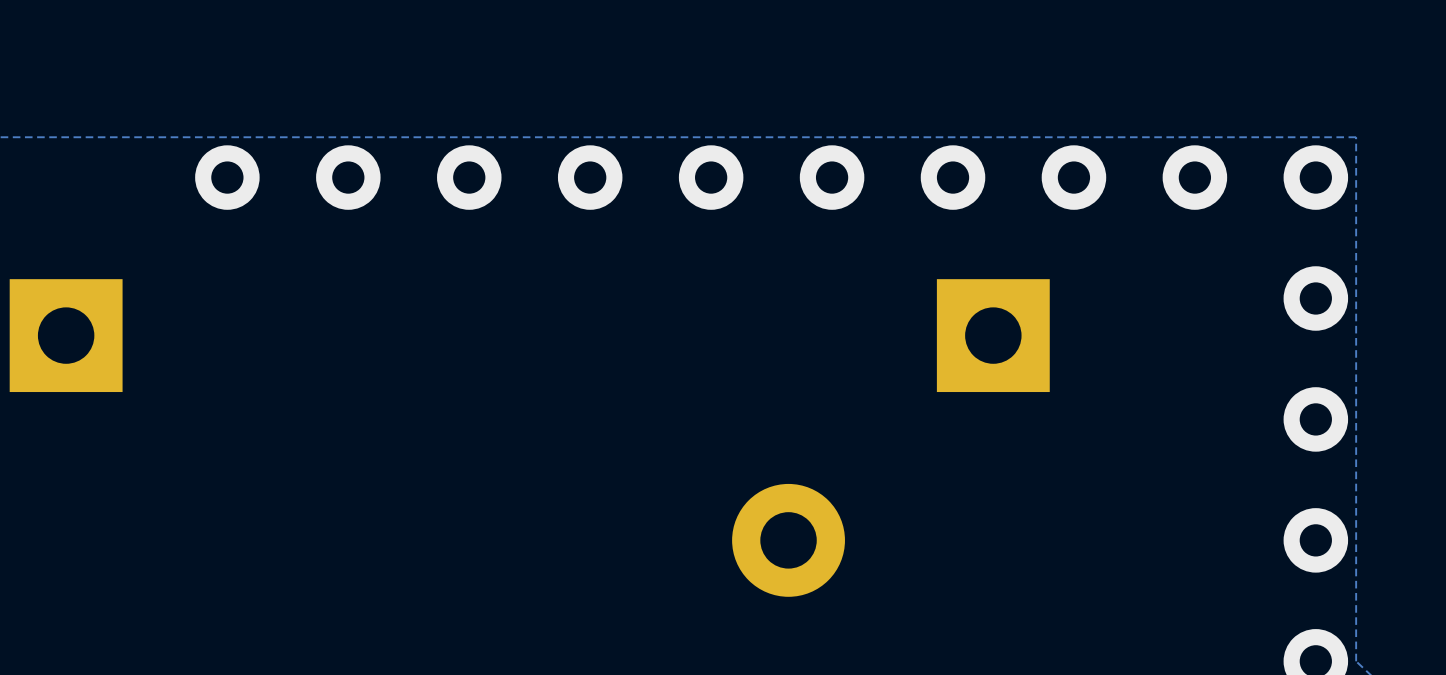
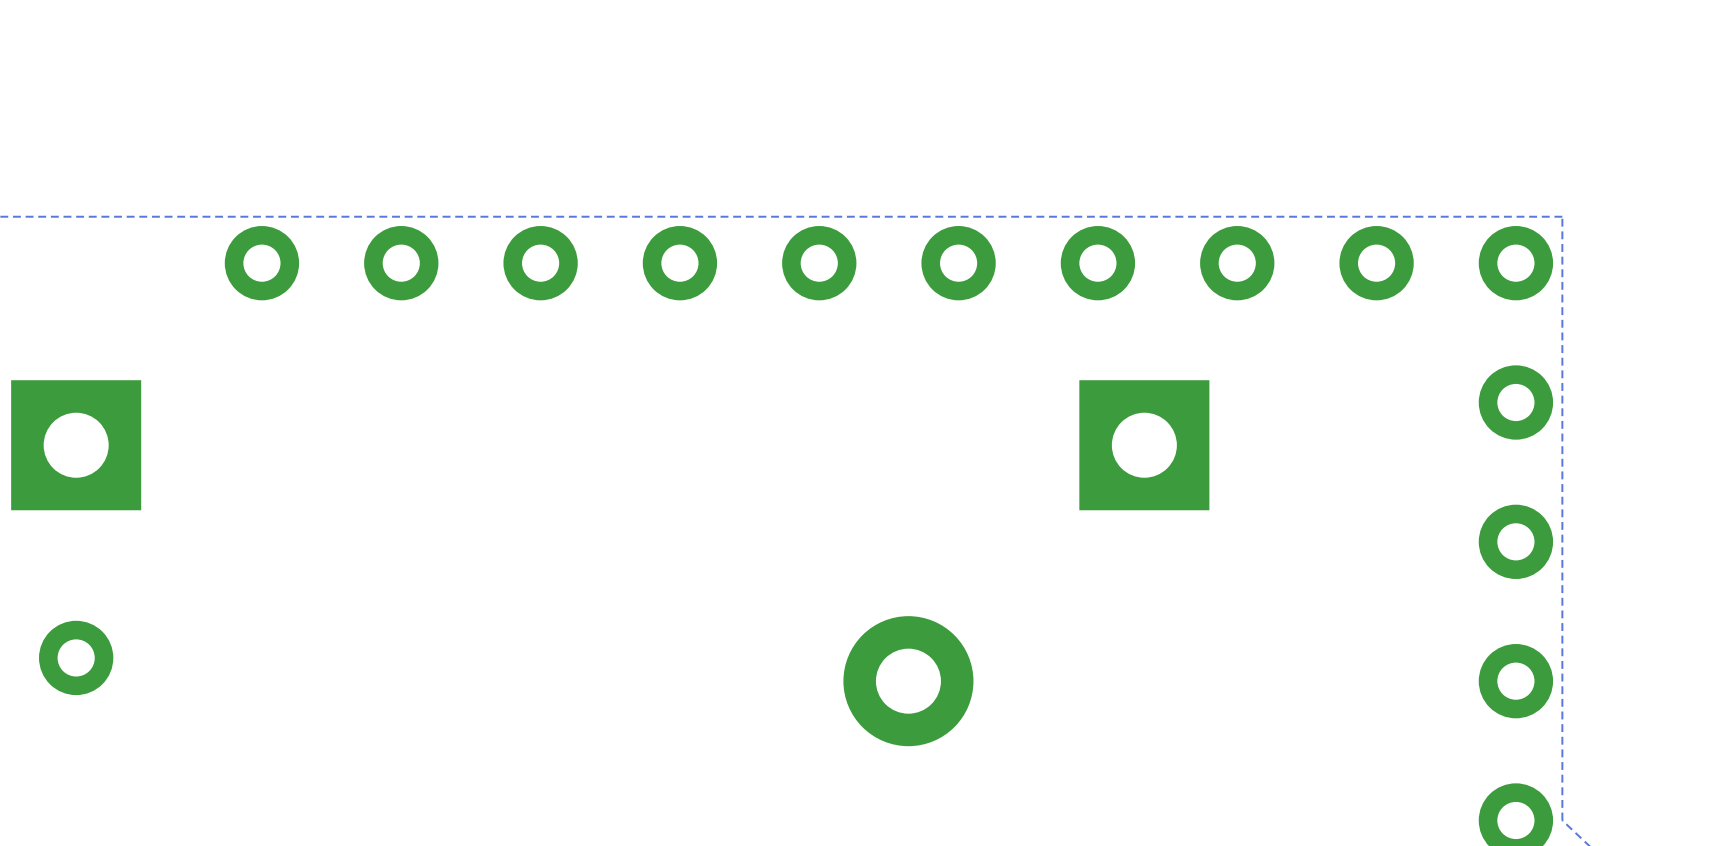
via: none -> (76, 657)

